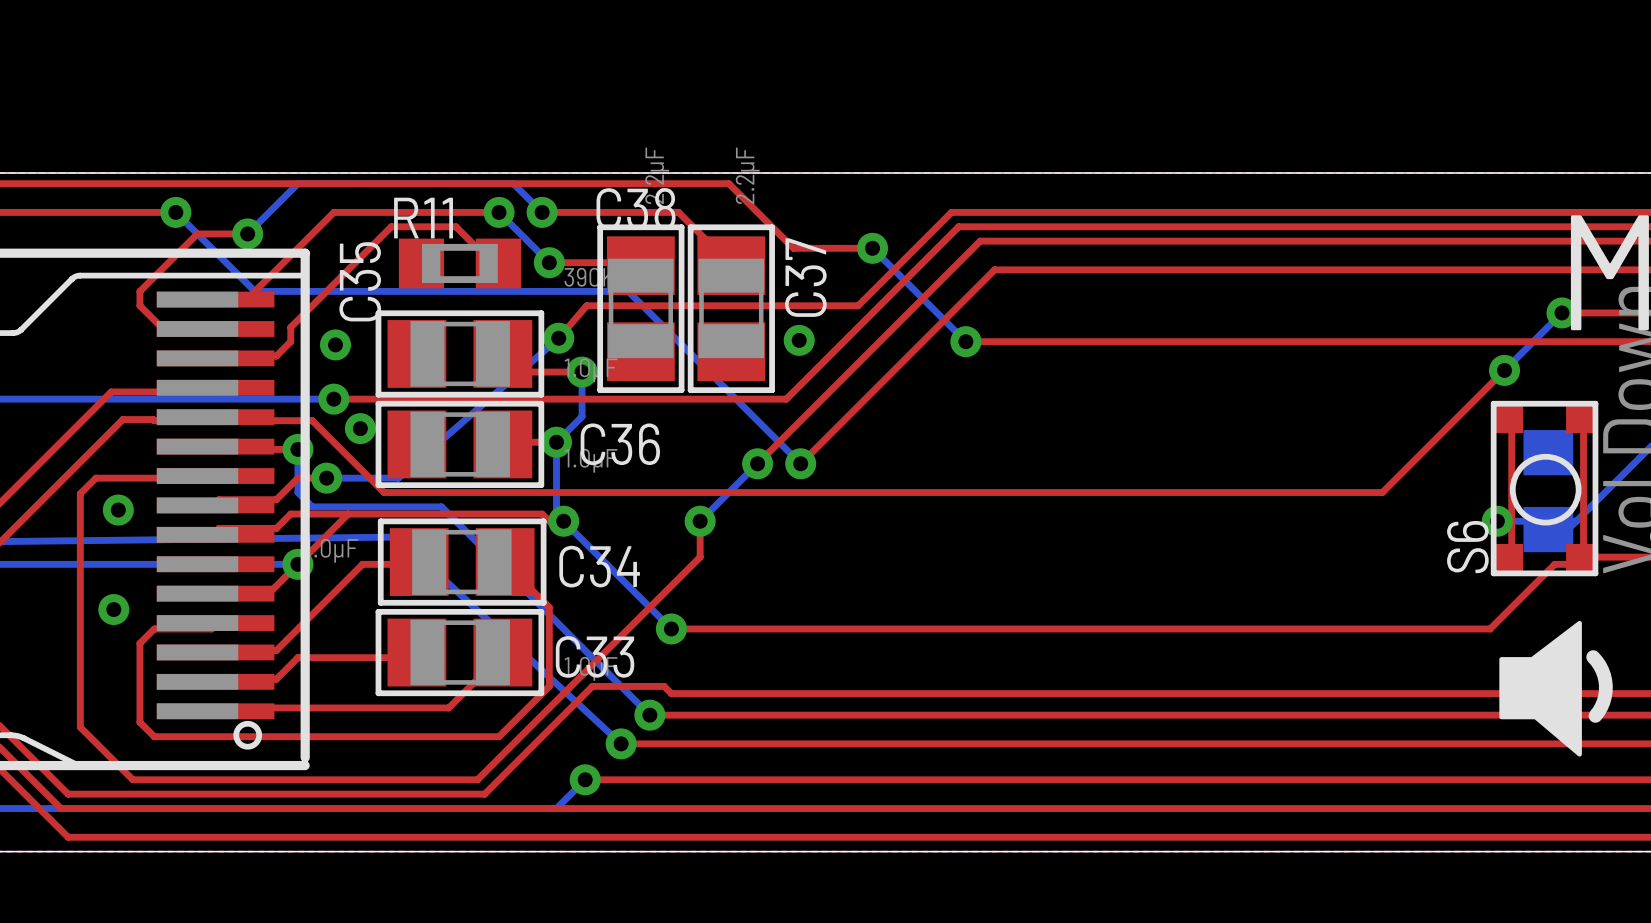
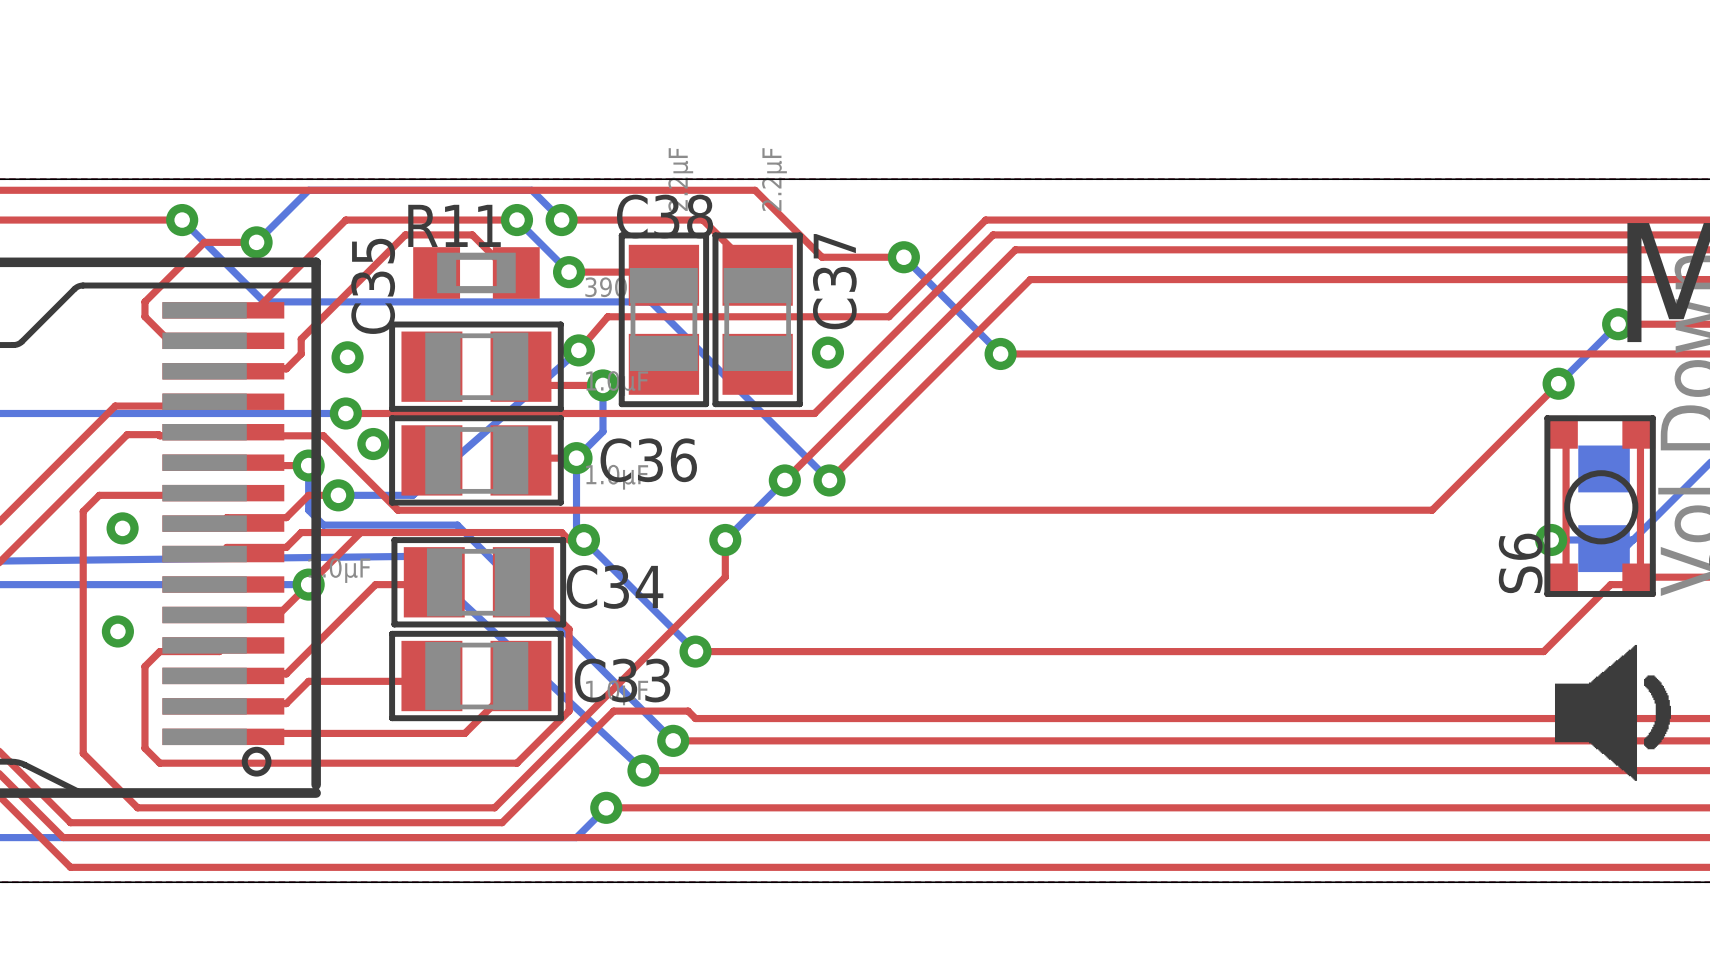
drawing shape: [1499, 620, 1582, 757] -> [1554, 712, 1638, 715]
drawing: none -> [1554, 644, 1671, 781]
line: (1593, 657) (1602, 670) (1605, 686) (1603, 701) (1595, 715) -> none

